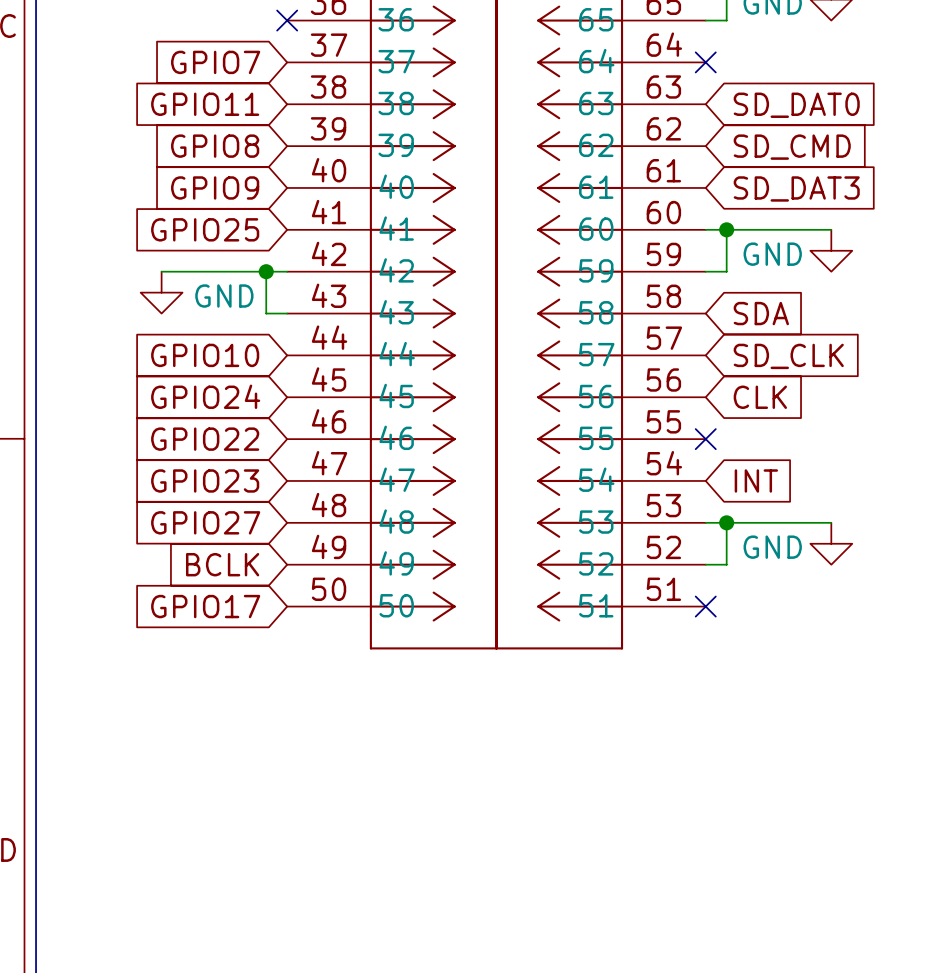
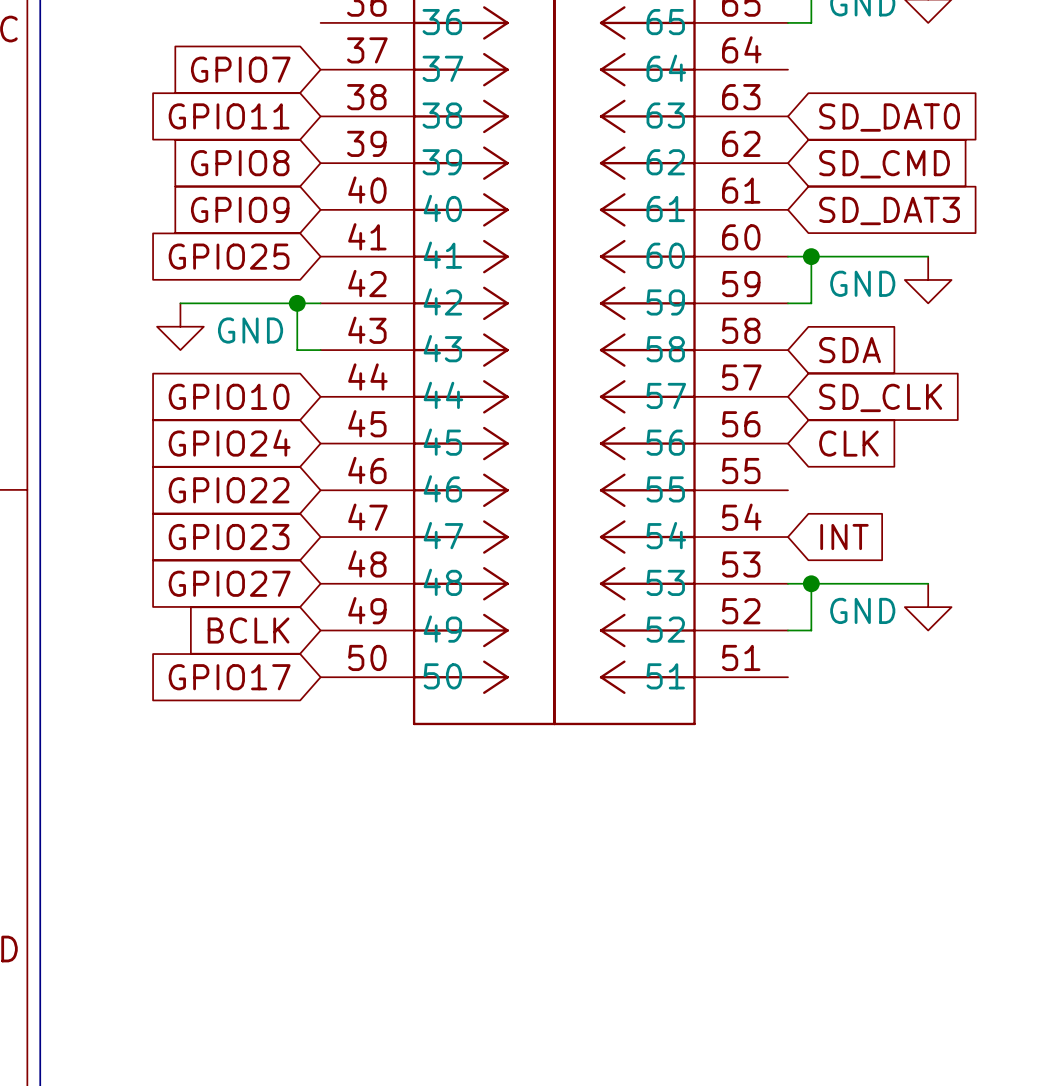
no-connect mark: (287, 20) -> none
no-connect mark: (705, 62) -> none
no-connect mark: (705, 439) -> none
no-connect mark: (705, 606) -> none

